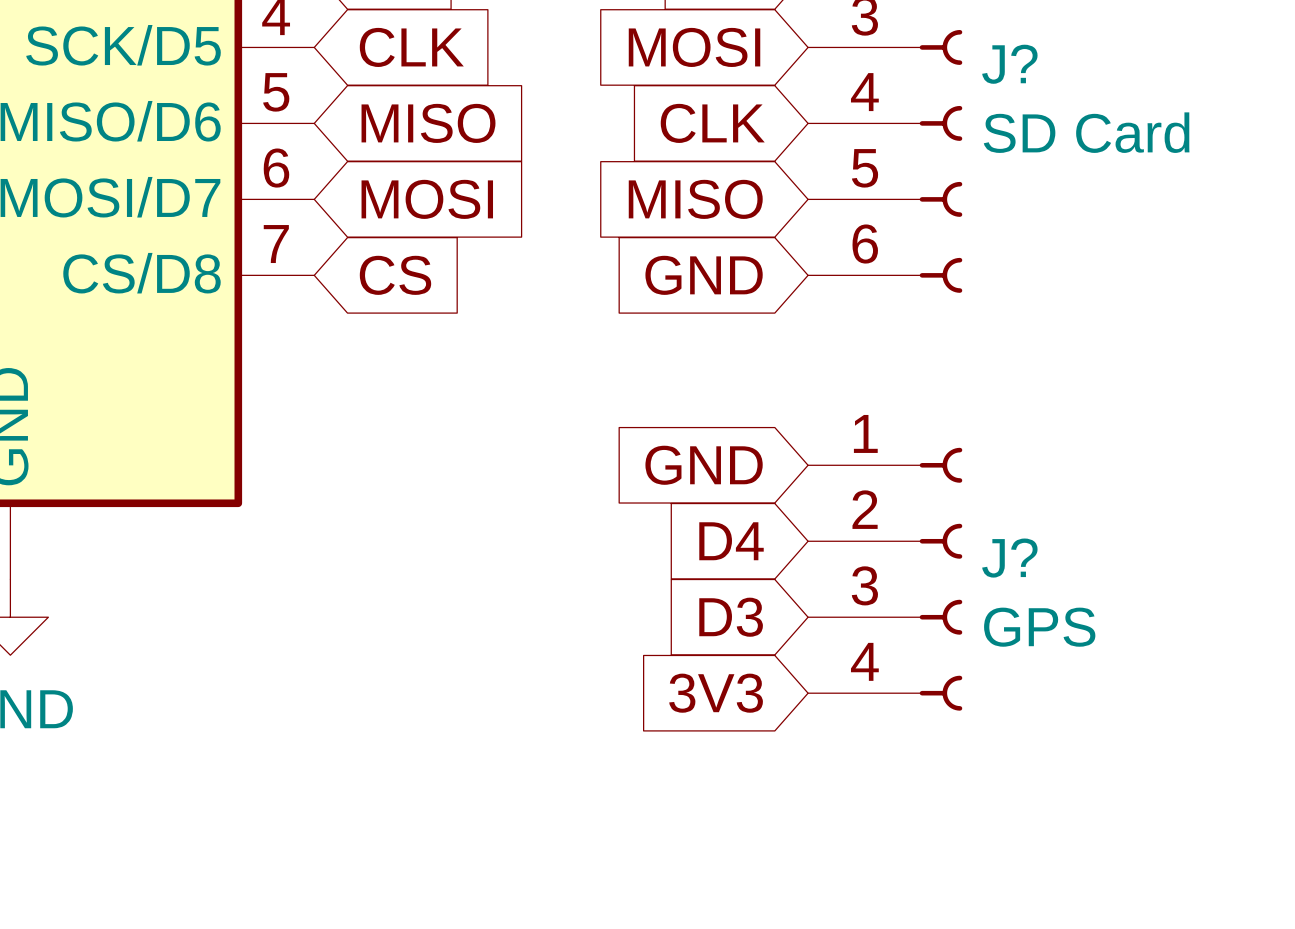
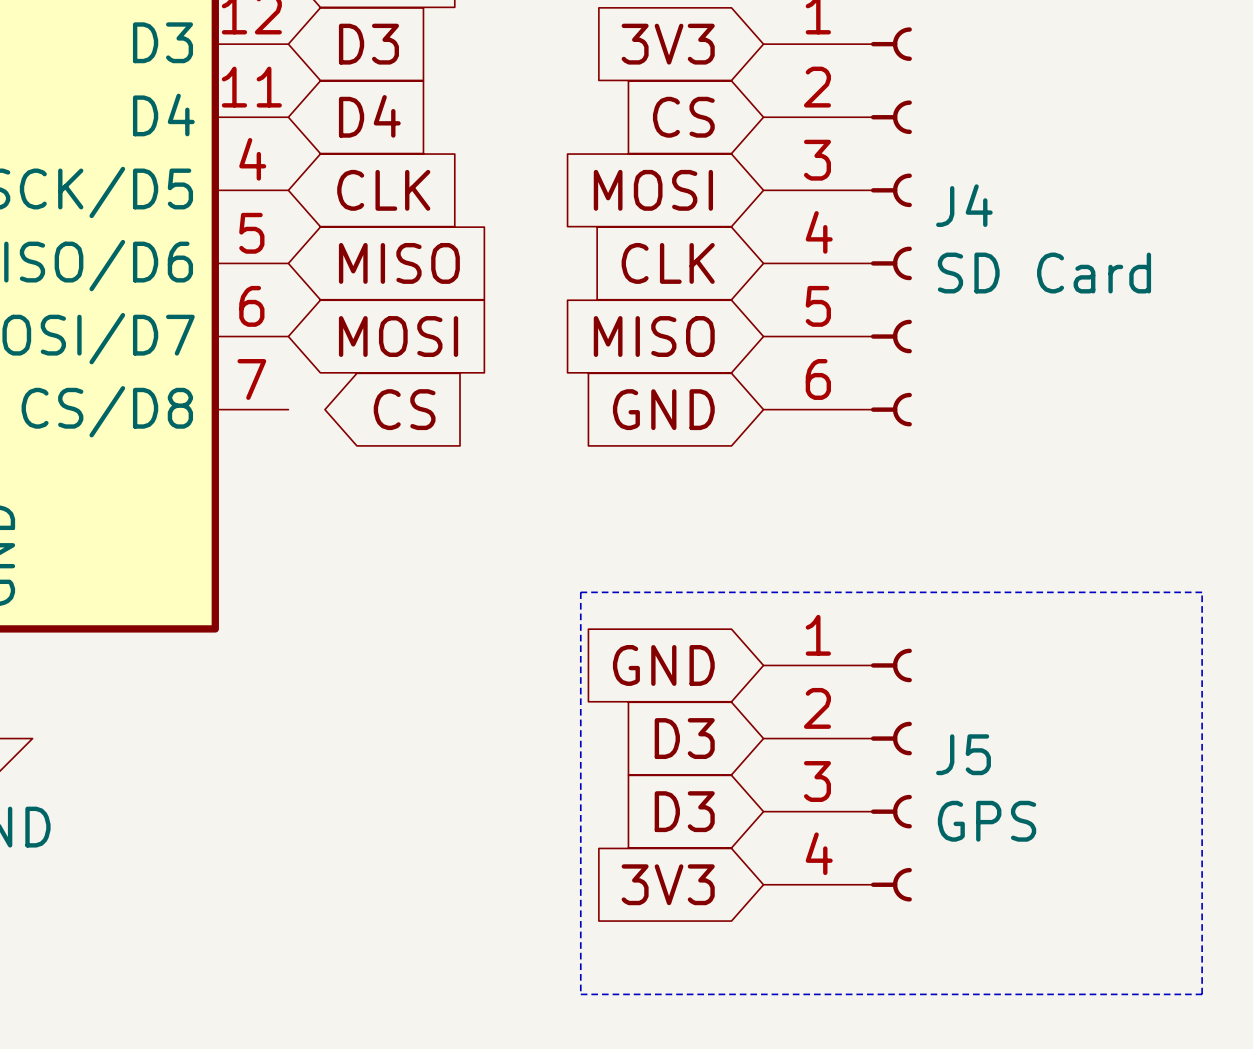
J? name: J? (1009, 64) -> J4 (964, 205)
global label position: CS (395, 275) -> CS (404, 409)
line: none -> (580, 592) (580, 994) (1202, 994) (1202, 592) (580, 592)
global label: GND (704, 465) -> none
global label: D4 (731, 541) -> GND (663, 665)
J?: GPS (885, 579) -> none
J5: none -> GPS (837, 775)
global label: 3V3 (716, 693) -> D3 (684, 811)
global label: none -> 3V3 (668, 884)

